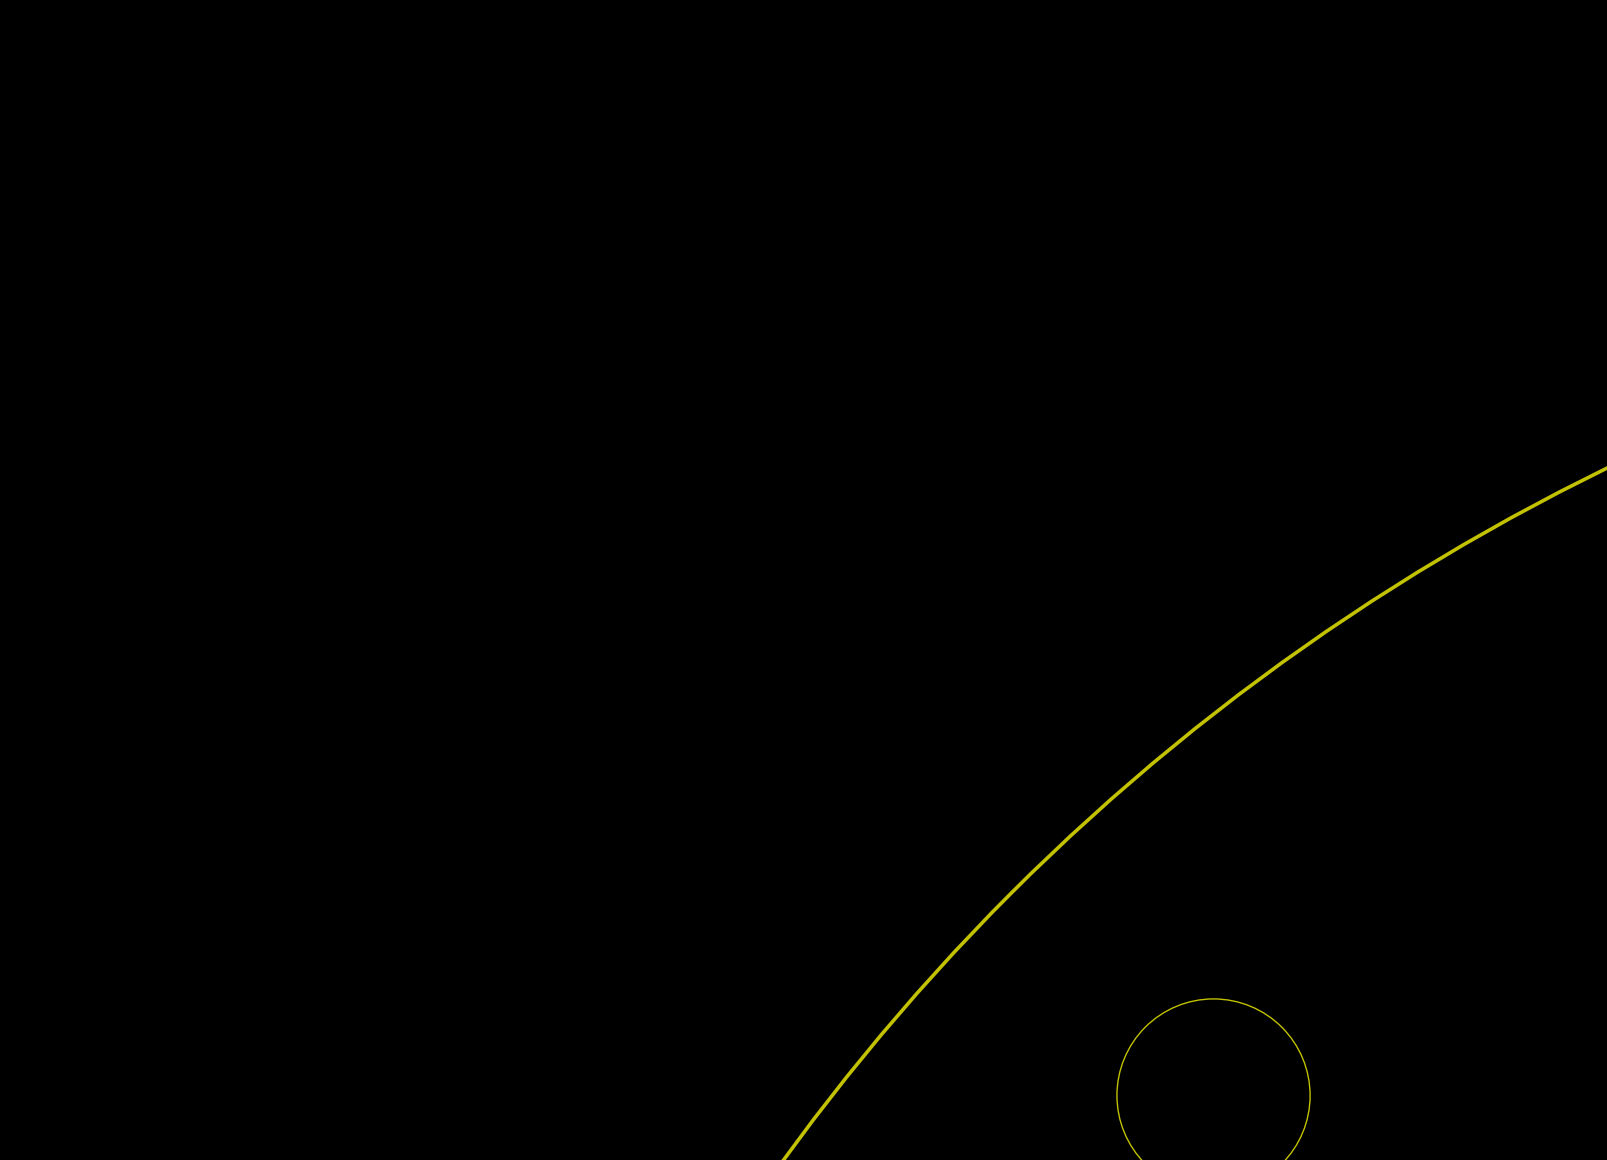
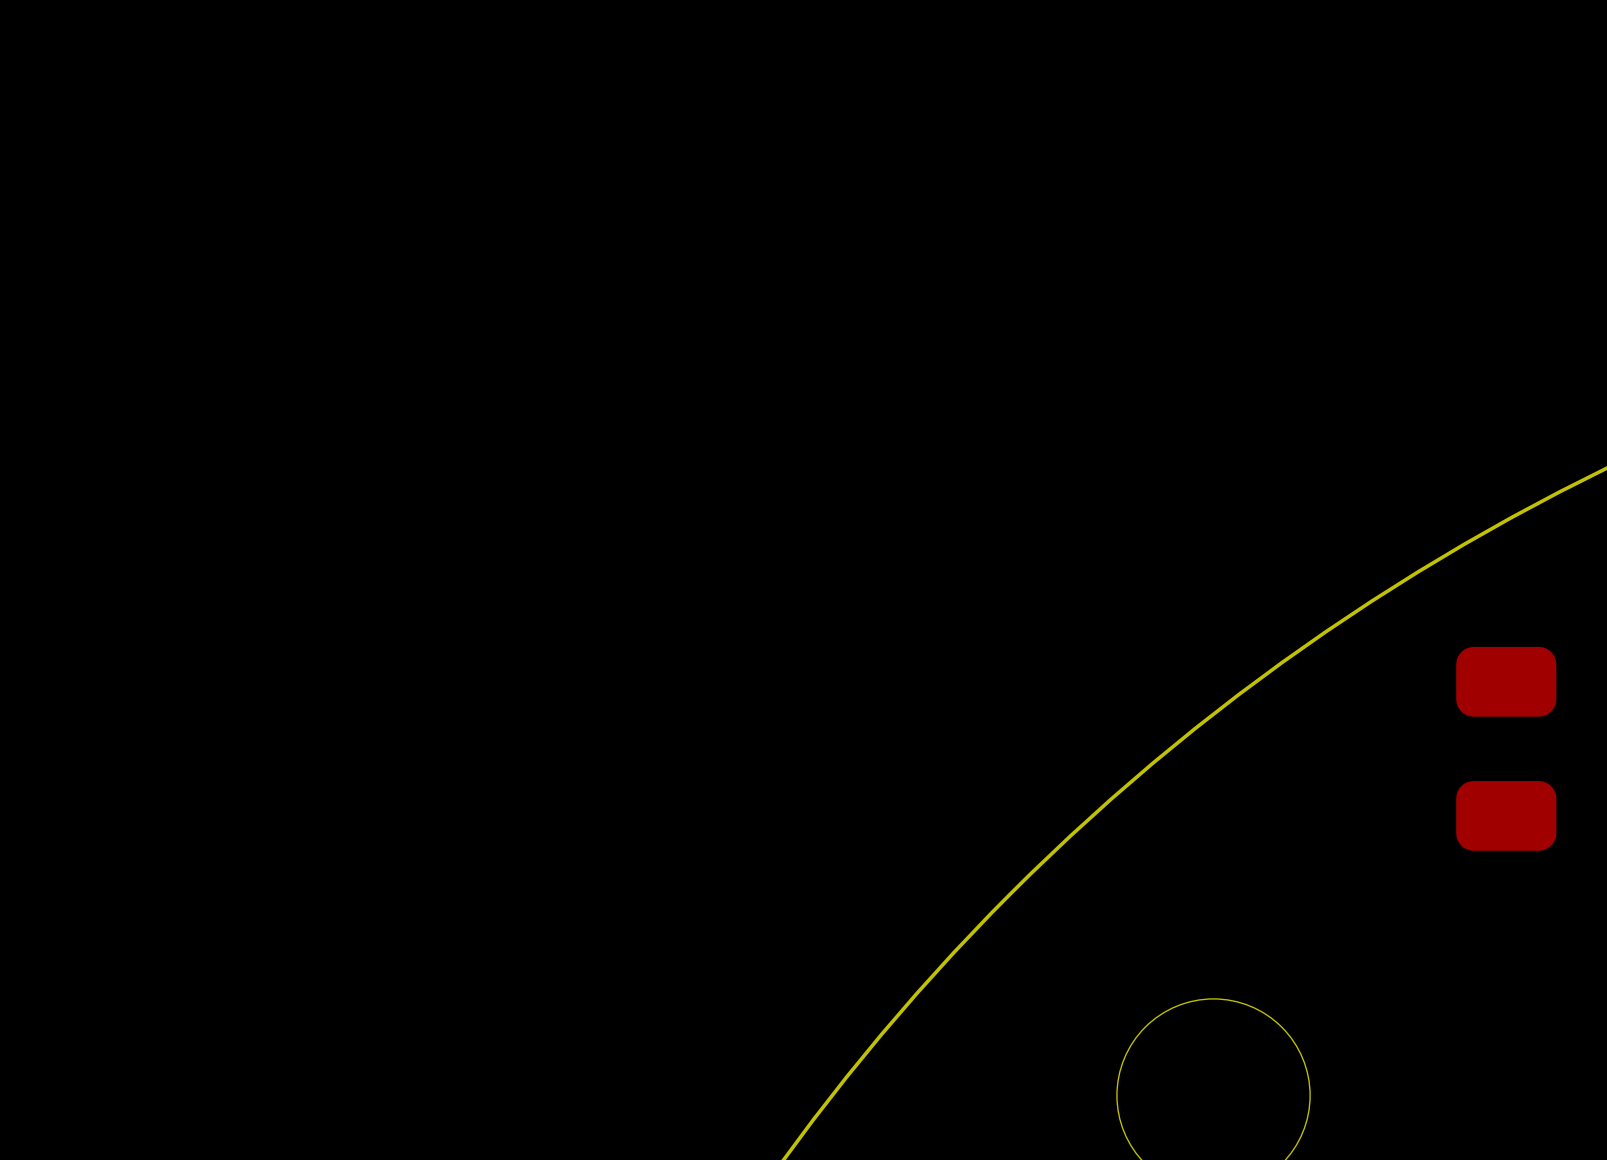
part: none -> (1506, 748)

